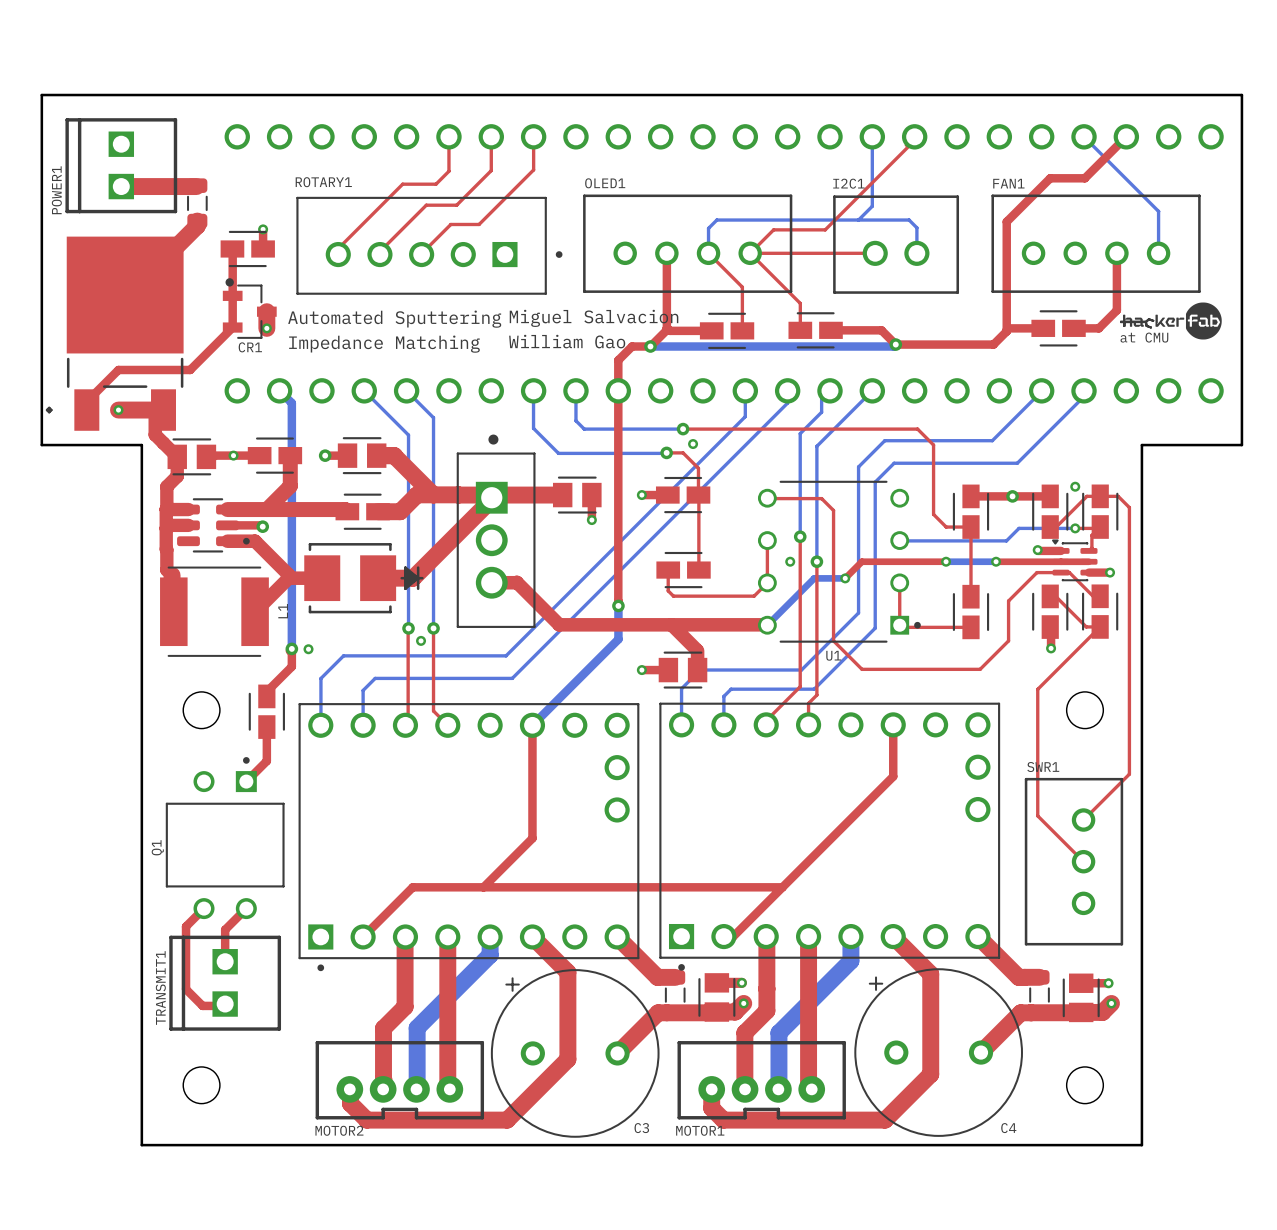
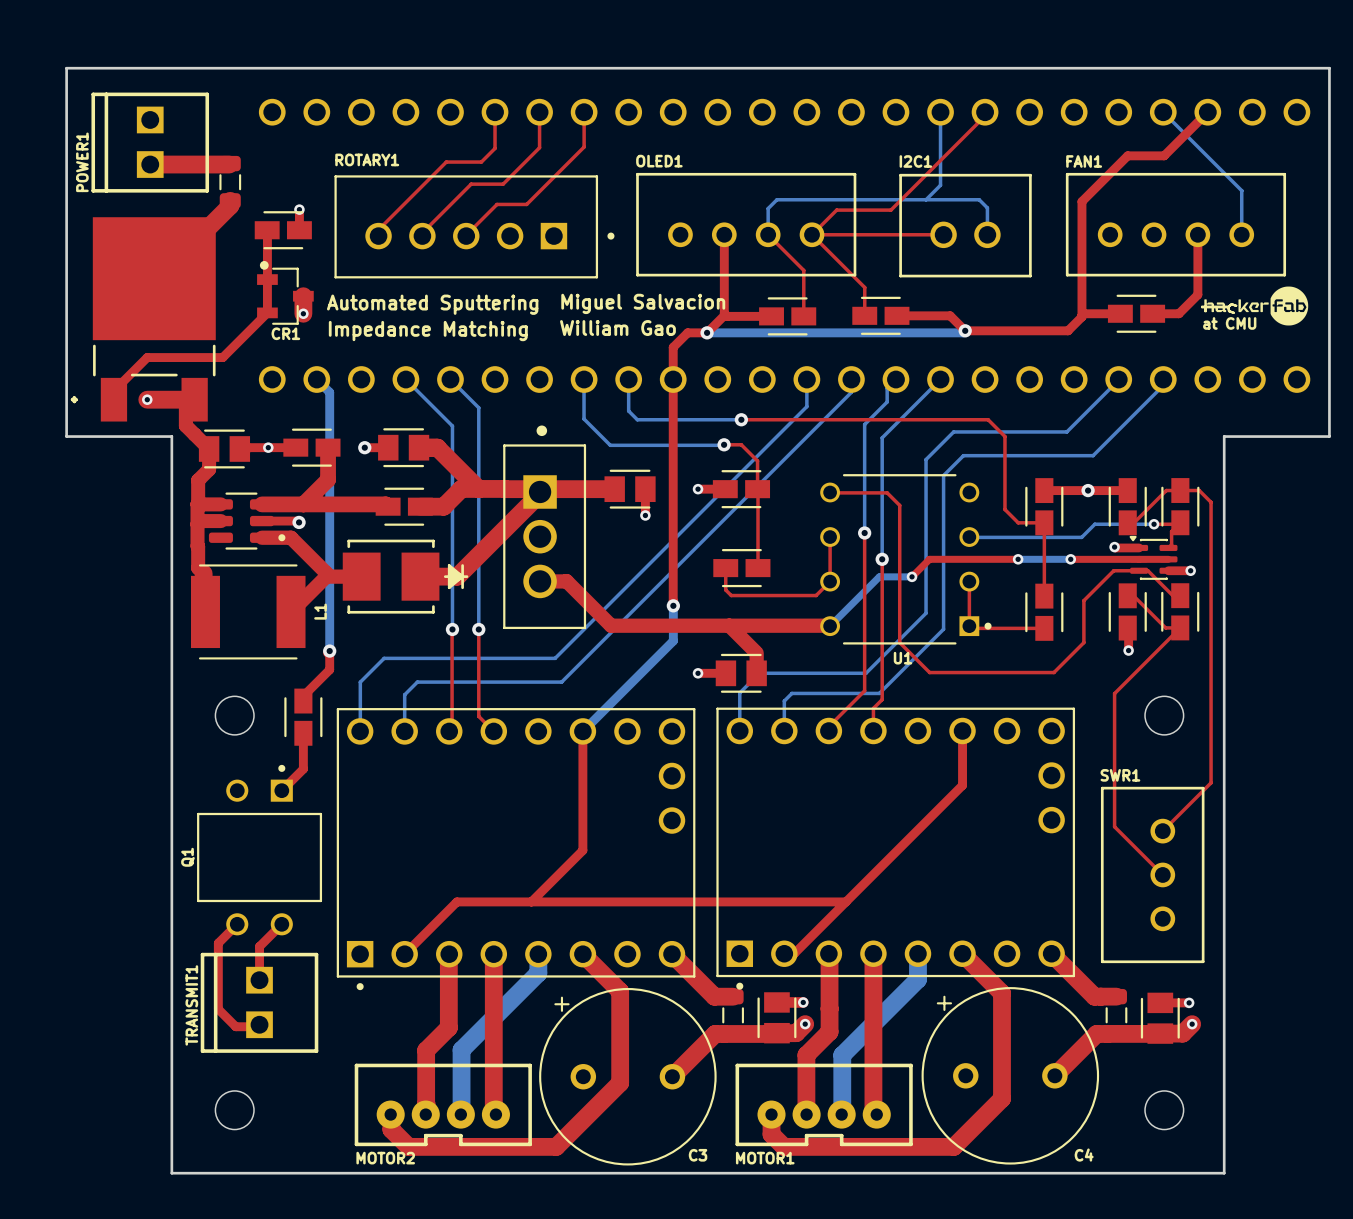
via: (693, 444) -> none
via: (1075, 486) -> none
via: (790, 561) -> none
via: (421, 640) -> none
via: (308, 649) -> none

